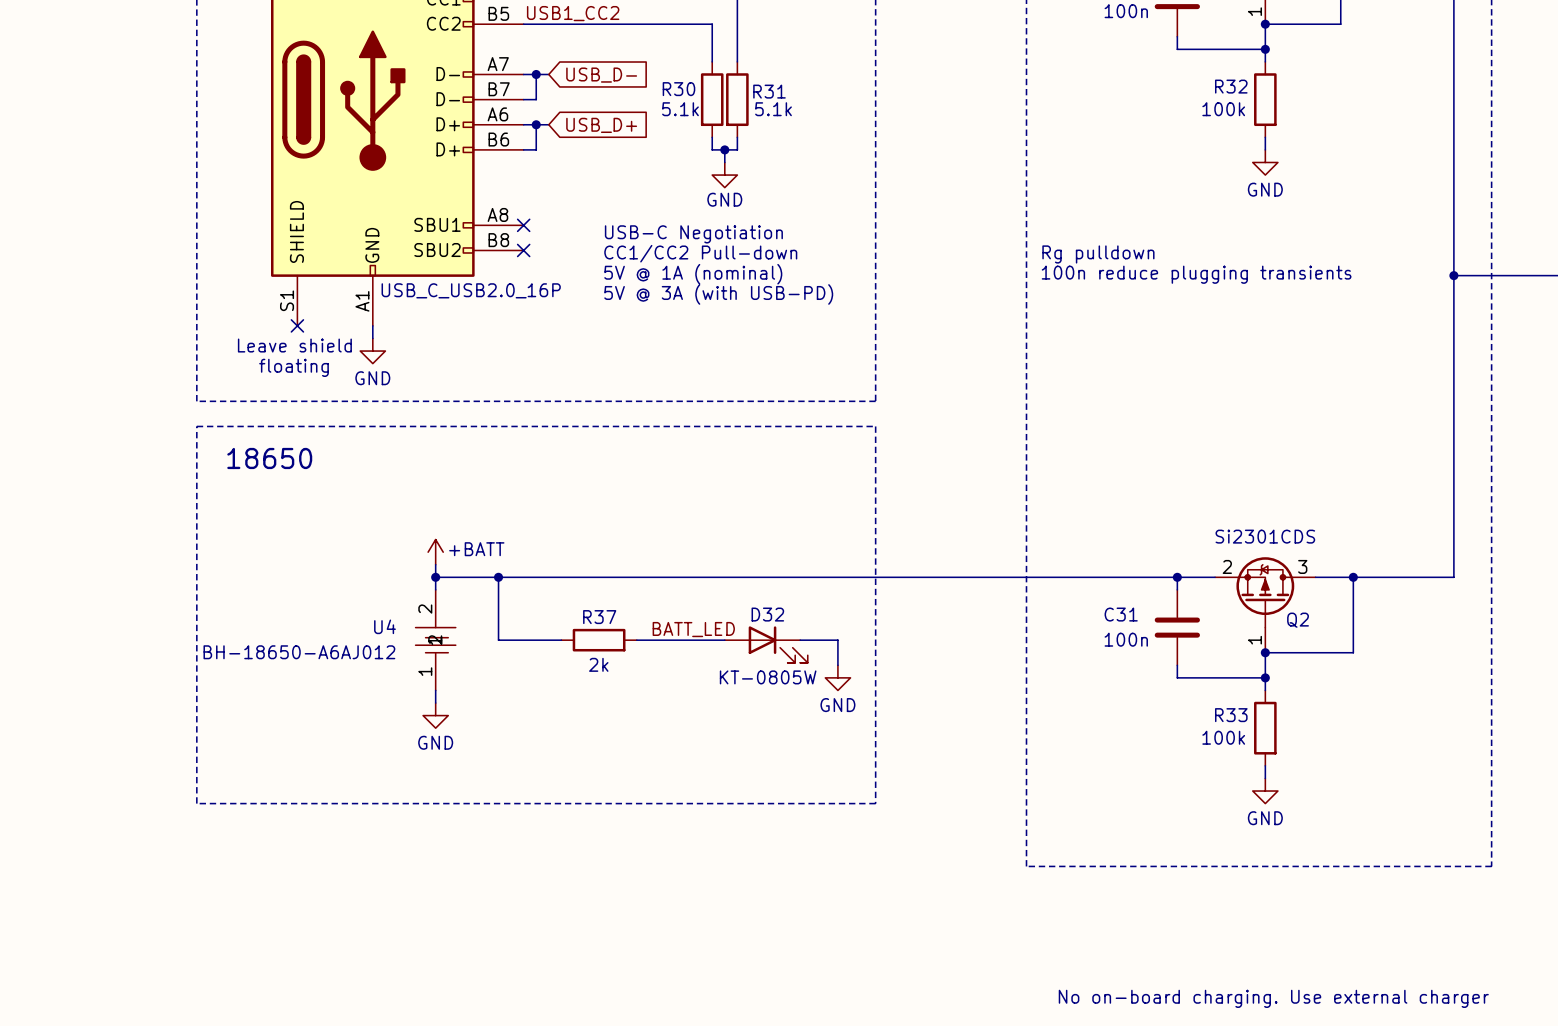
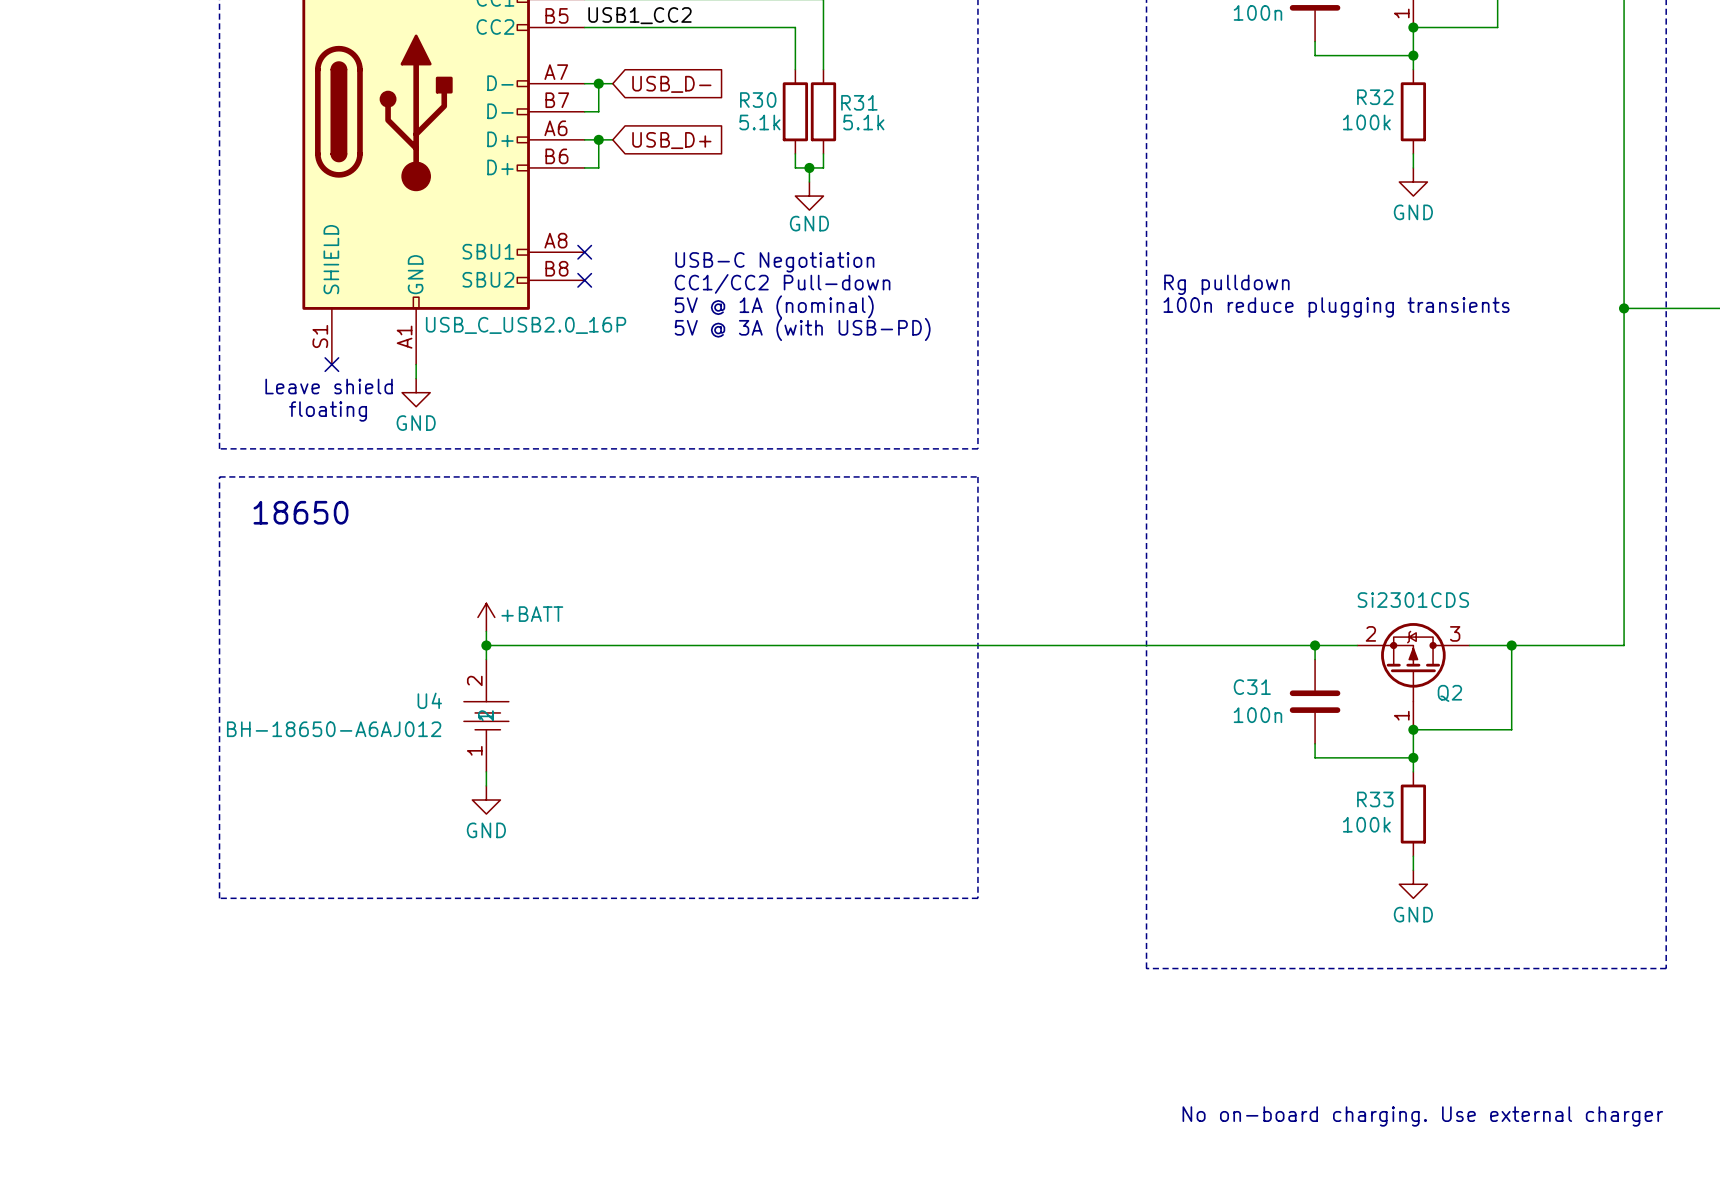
wire: (498, 577) (498, 640) (561, 640) -> none
junction: (498, 577) -> none
label: BATT_LED (693, 629) -> none
R37: 2k (599, 640) -> none
wire: (636, 640) (724, 640) -> none
wire: (800, 640) (837, 640) (837, 665) -> none
D32: KT-0805W (766, 644) -> none
power symbol: GND (837, 677) -> none

